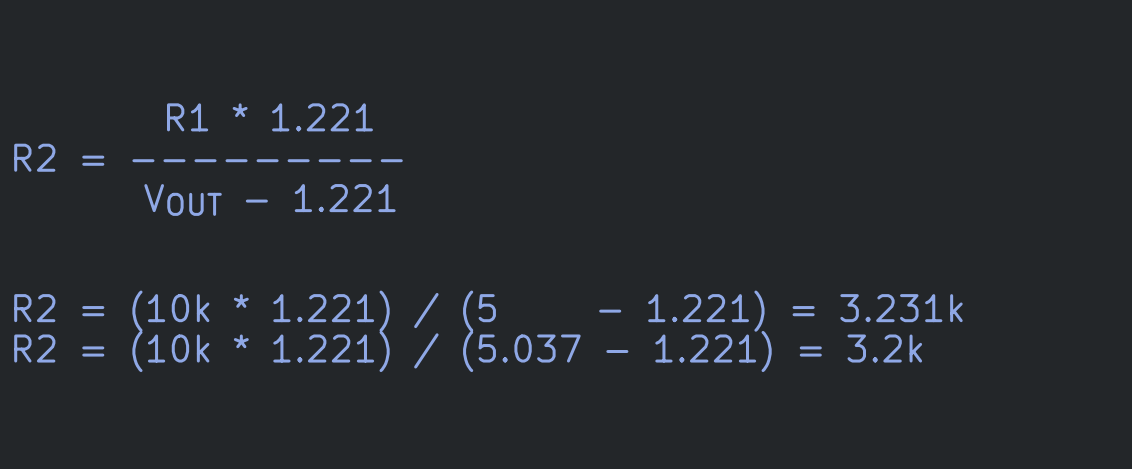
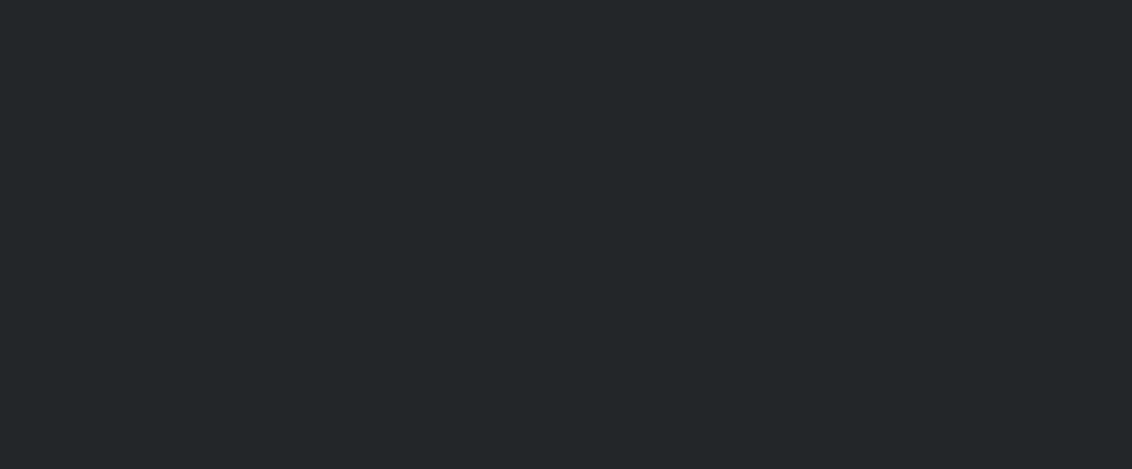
text: R1 * 1.221 (269, 117) -> none
text: R2 = --------- (208, 157) -> none
text: VOUT - 1.221 (269, 199) -> none
text: R2 = (10k * 1.221) / (5 - 1.221) = 3.231k (488, 311) -> none
text: R2 = (10k * 1.221) / (5.037 - 1.221) = 3.2k (468, 351) -> none

